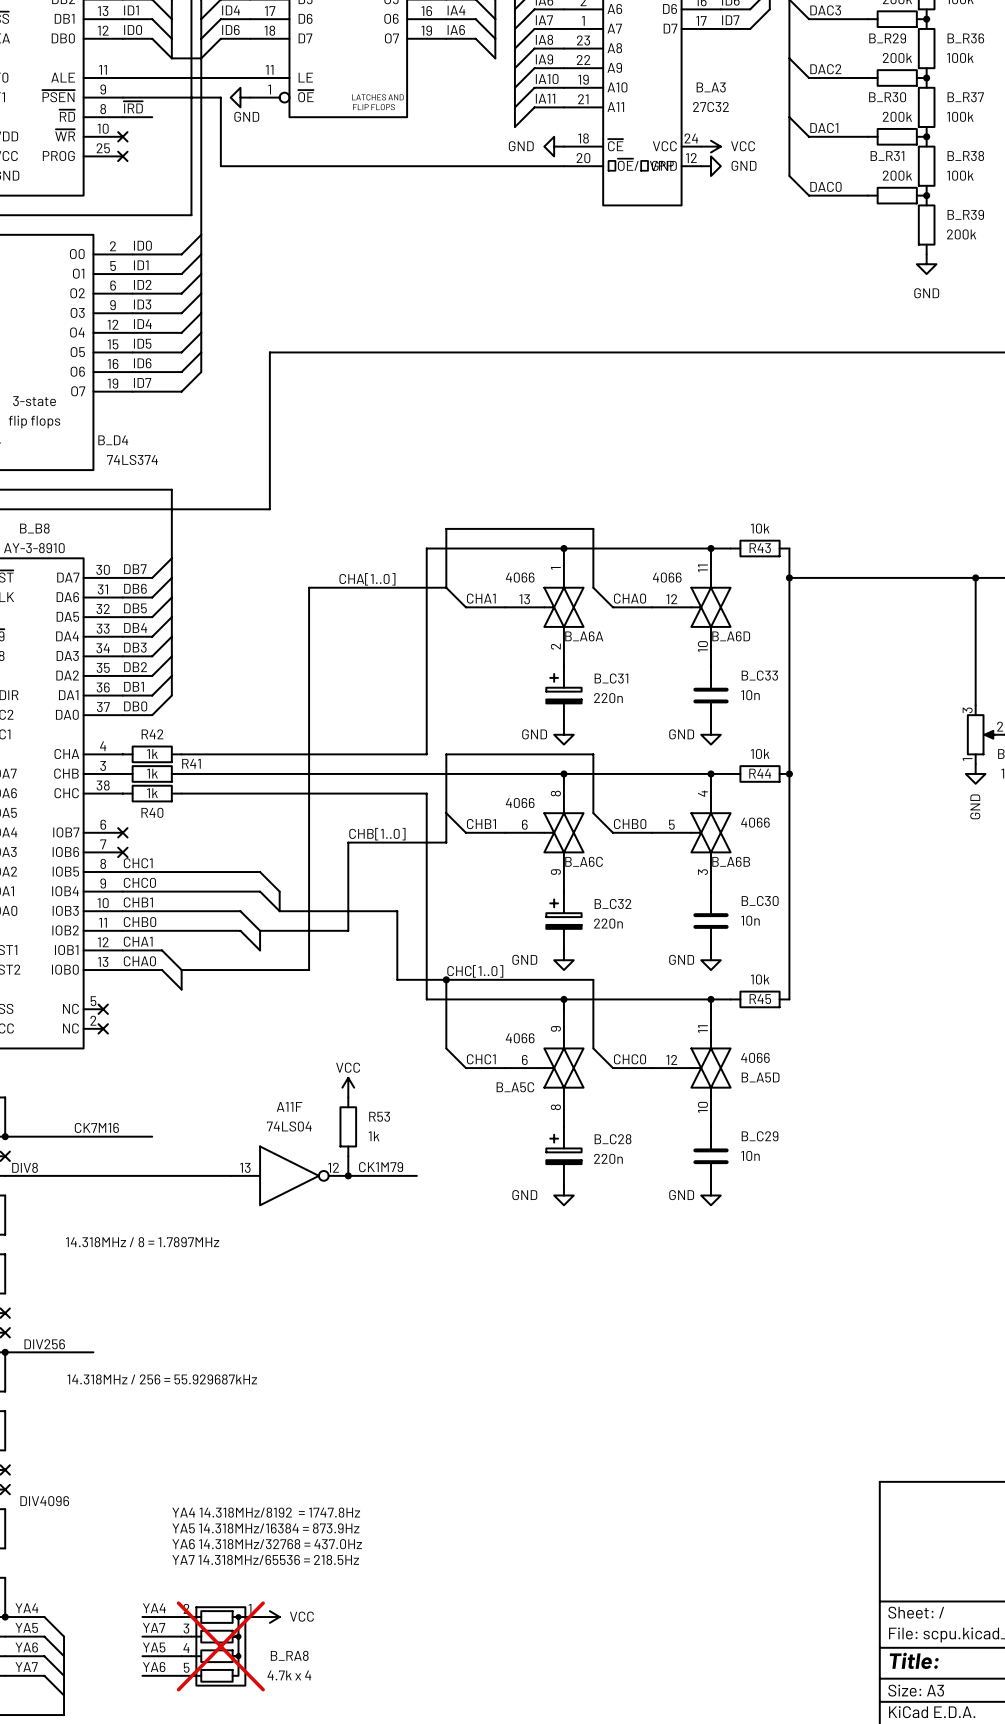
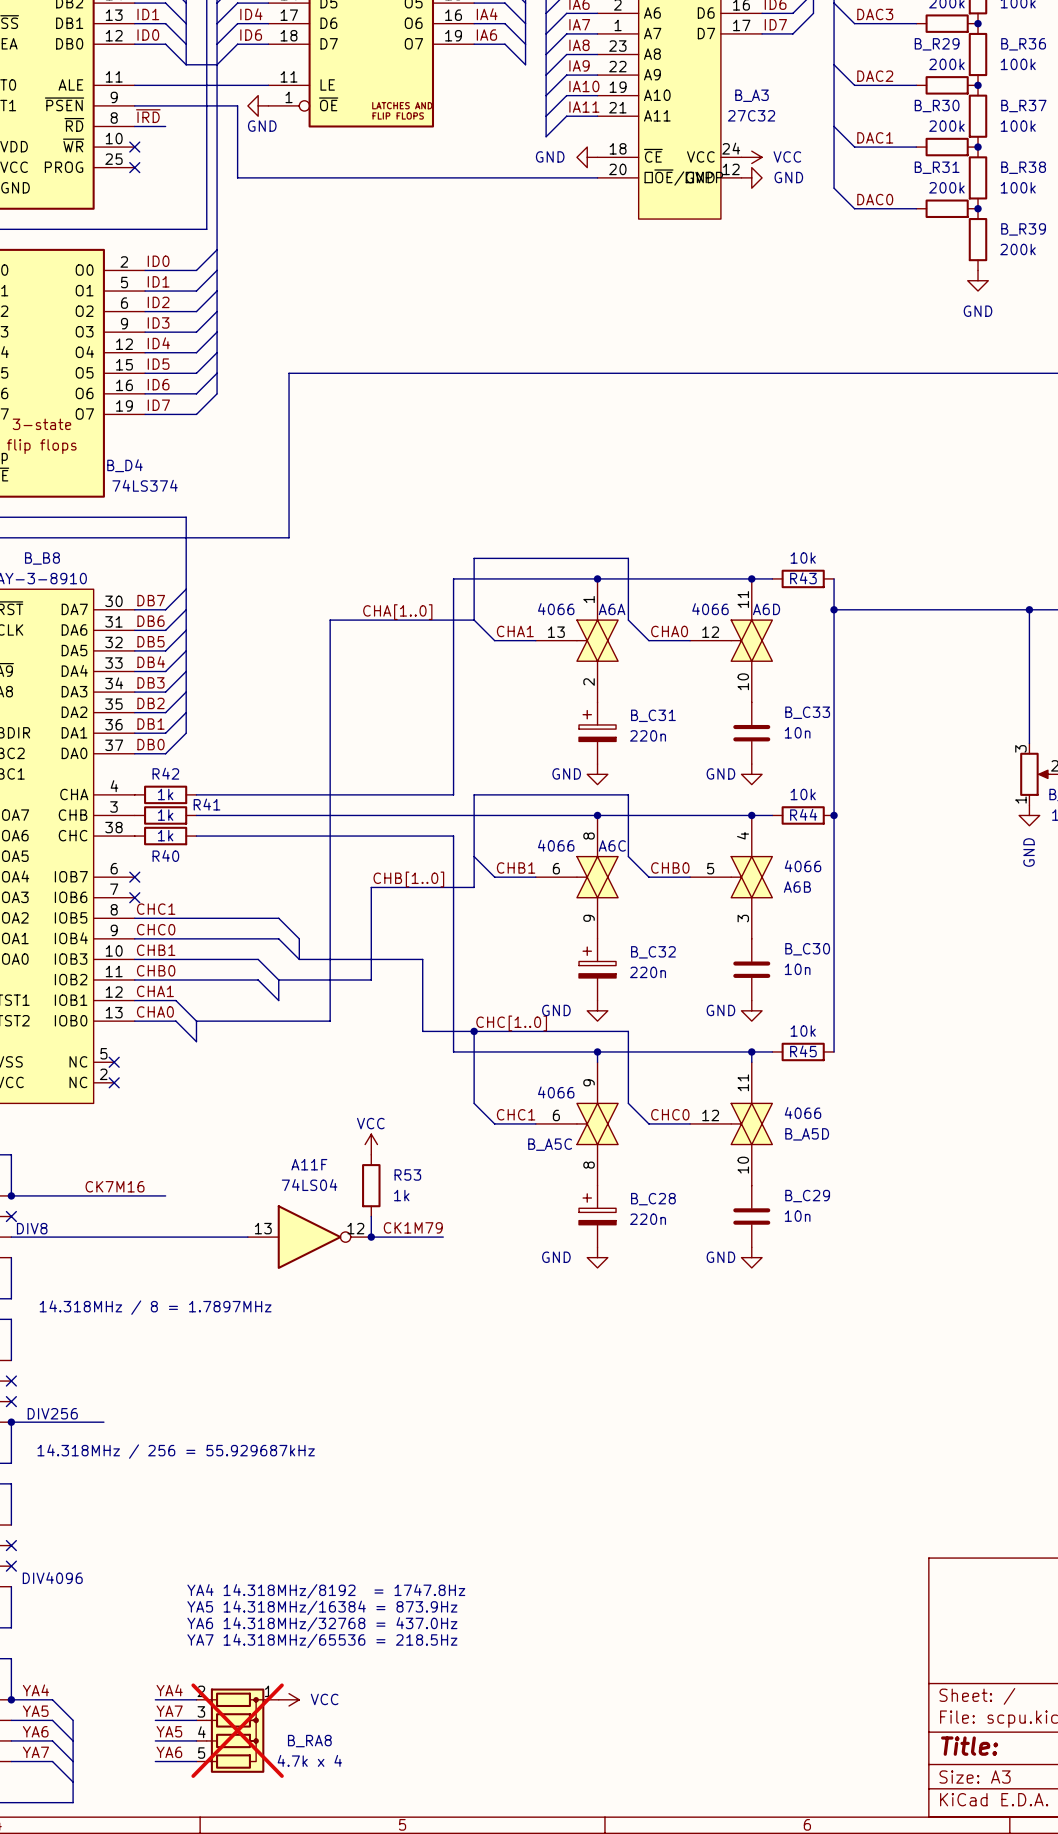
B_A6A name: B_A6A (584, 636) -> A6A (612, 609)
B_A6D name: B_A6D (731, 636) -> A6D (766, 609)
B_A6C name: B_A6C (584, 861) -> A6C (612, 845)
B_A6B name: B_A6B (731, 861) -> A6B (797, 887)

